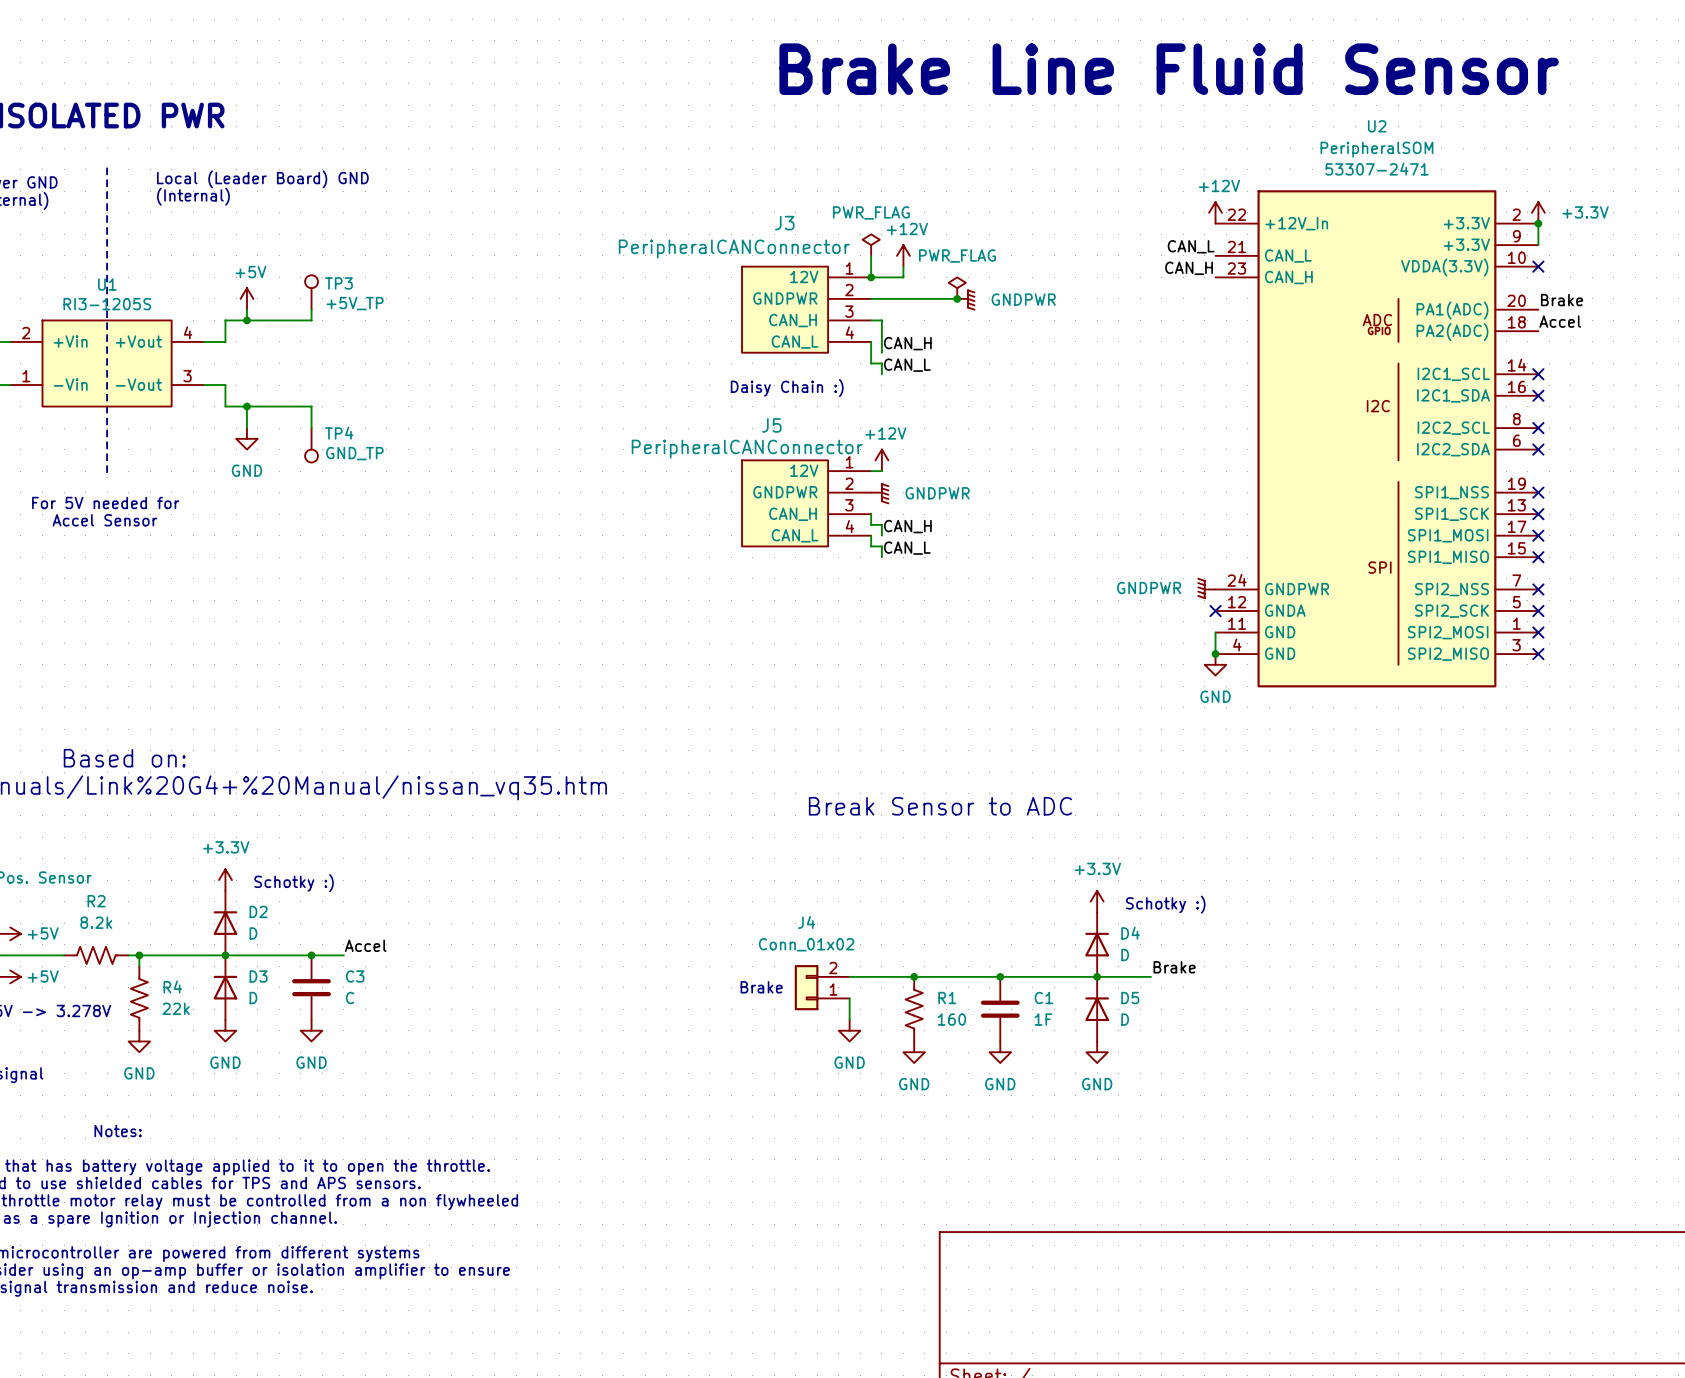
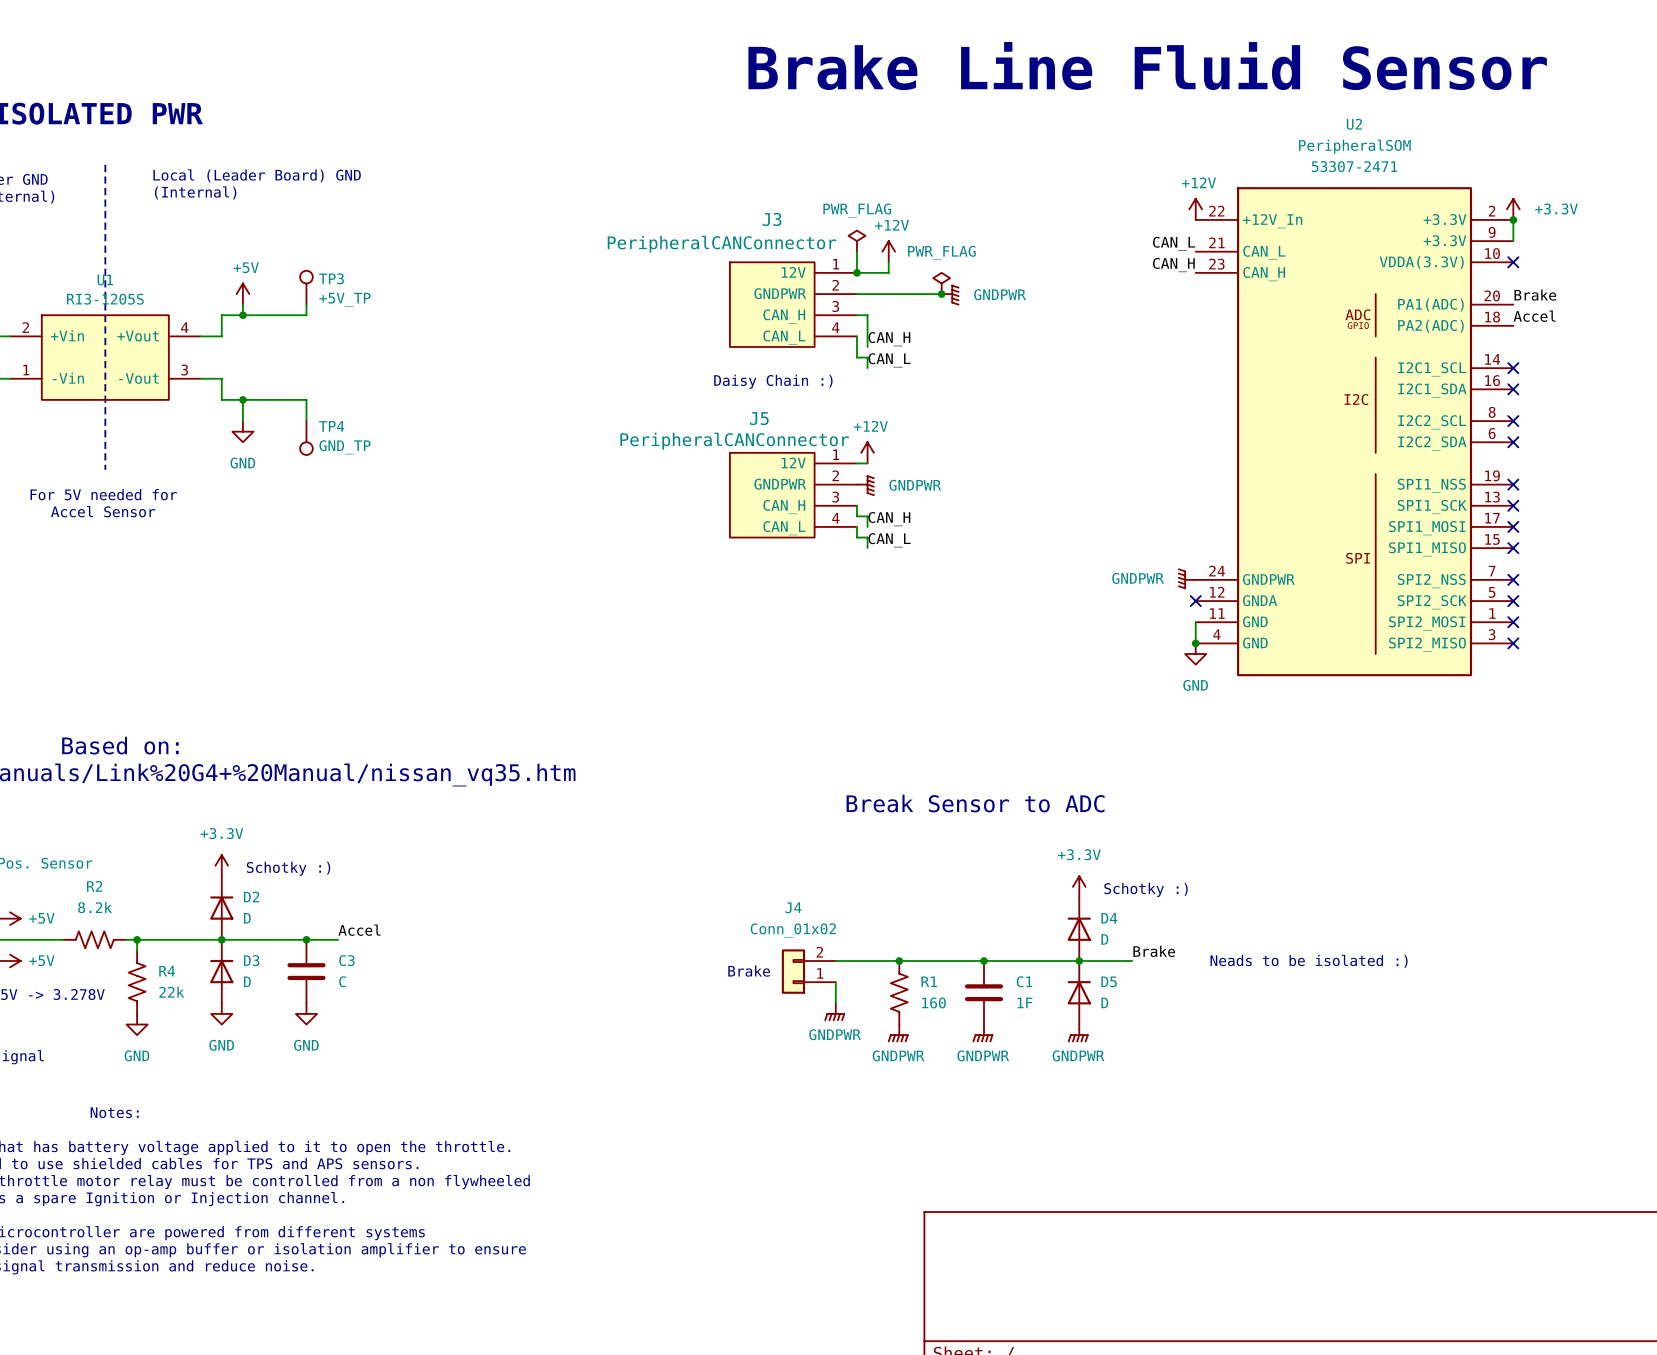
text position: Break Sensor to ADC (940, 806) -> Break Sensor to ADC (975, 803)
text: none -> Neads to be isolated :) (1309, 961)
power symbol: GND (849, 1030) -> GNDPWR (834, 1012)
power symbol: GND (914, 1052) -> GNDPWR (898, 1033)
power symbol: GND (1000, 1052) -> GNDPWR (982, 1033)
power symbol: GND (1097, 1052) -> GNDPWR (1078, 1033)

